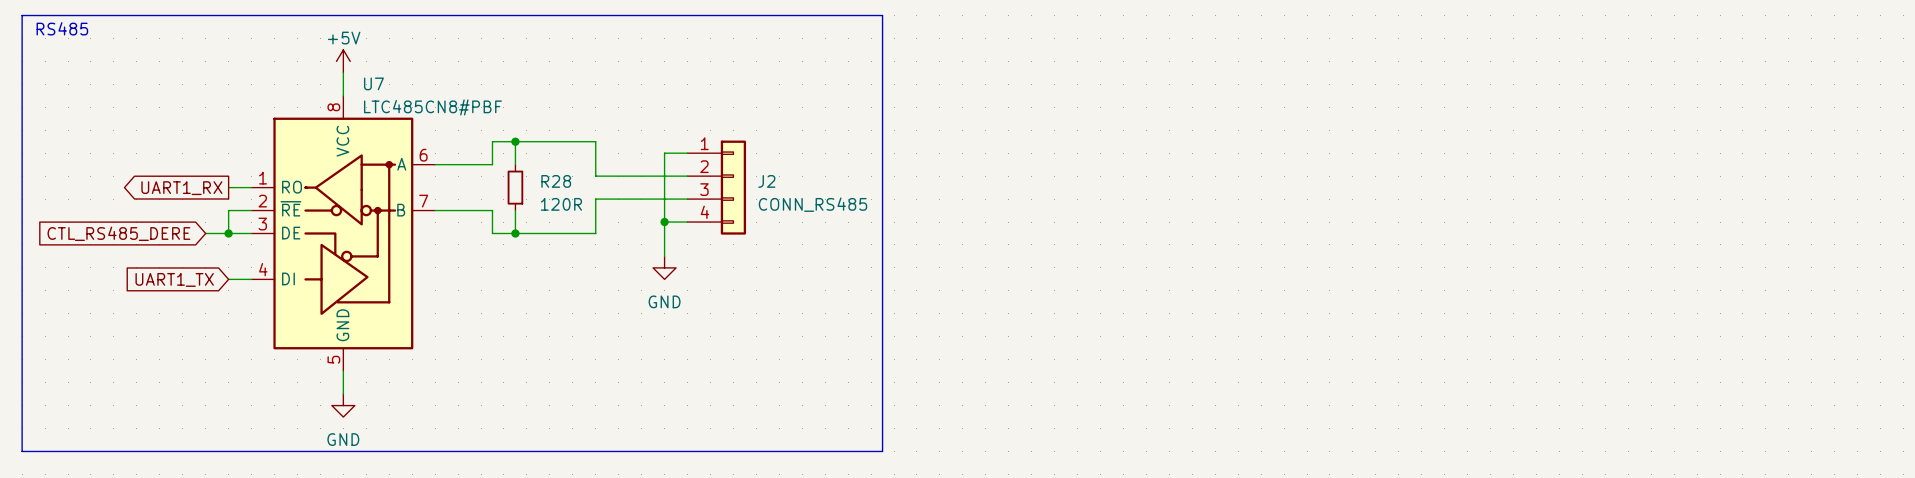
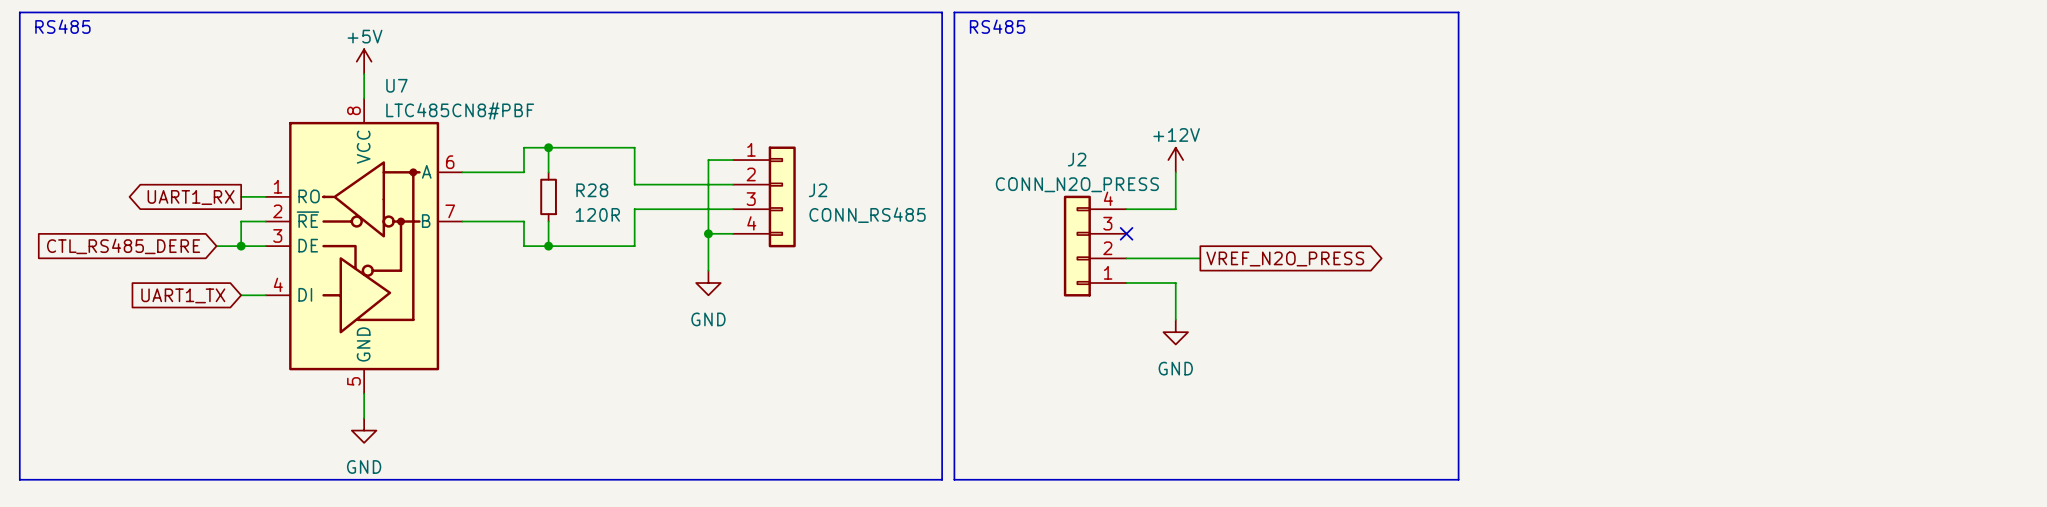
line: none -> (954, 12) (1458, 12) (1458, 479) (954, 479) (954, 12)
text: none -> RS485 (997, 26)
power symbol: none -> +12V (1175, 160)
wire: none -> (1175, 172) (1175, 209) (1126, 209)
no-connect mark: none -> (1126, 233)
J2: none -> CONN_N2O_PRESS (1095, 246)
wire: none -> (1126, 258) (1200, 258)
global label: none -> VREF_N2O_PRESS (1285, 258)
wire: none -> (1126, 283) (1175, 283) (1175, 319)
power symbol: none -> GND (1175, 332)

